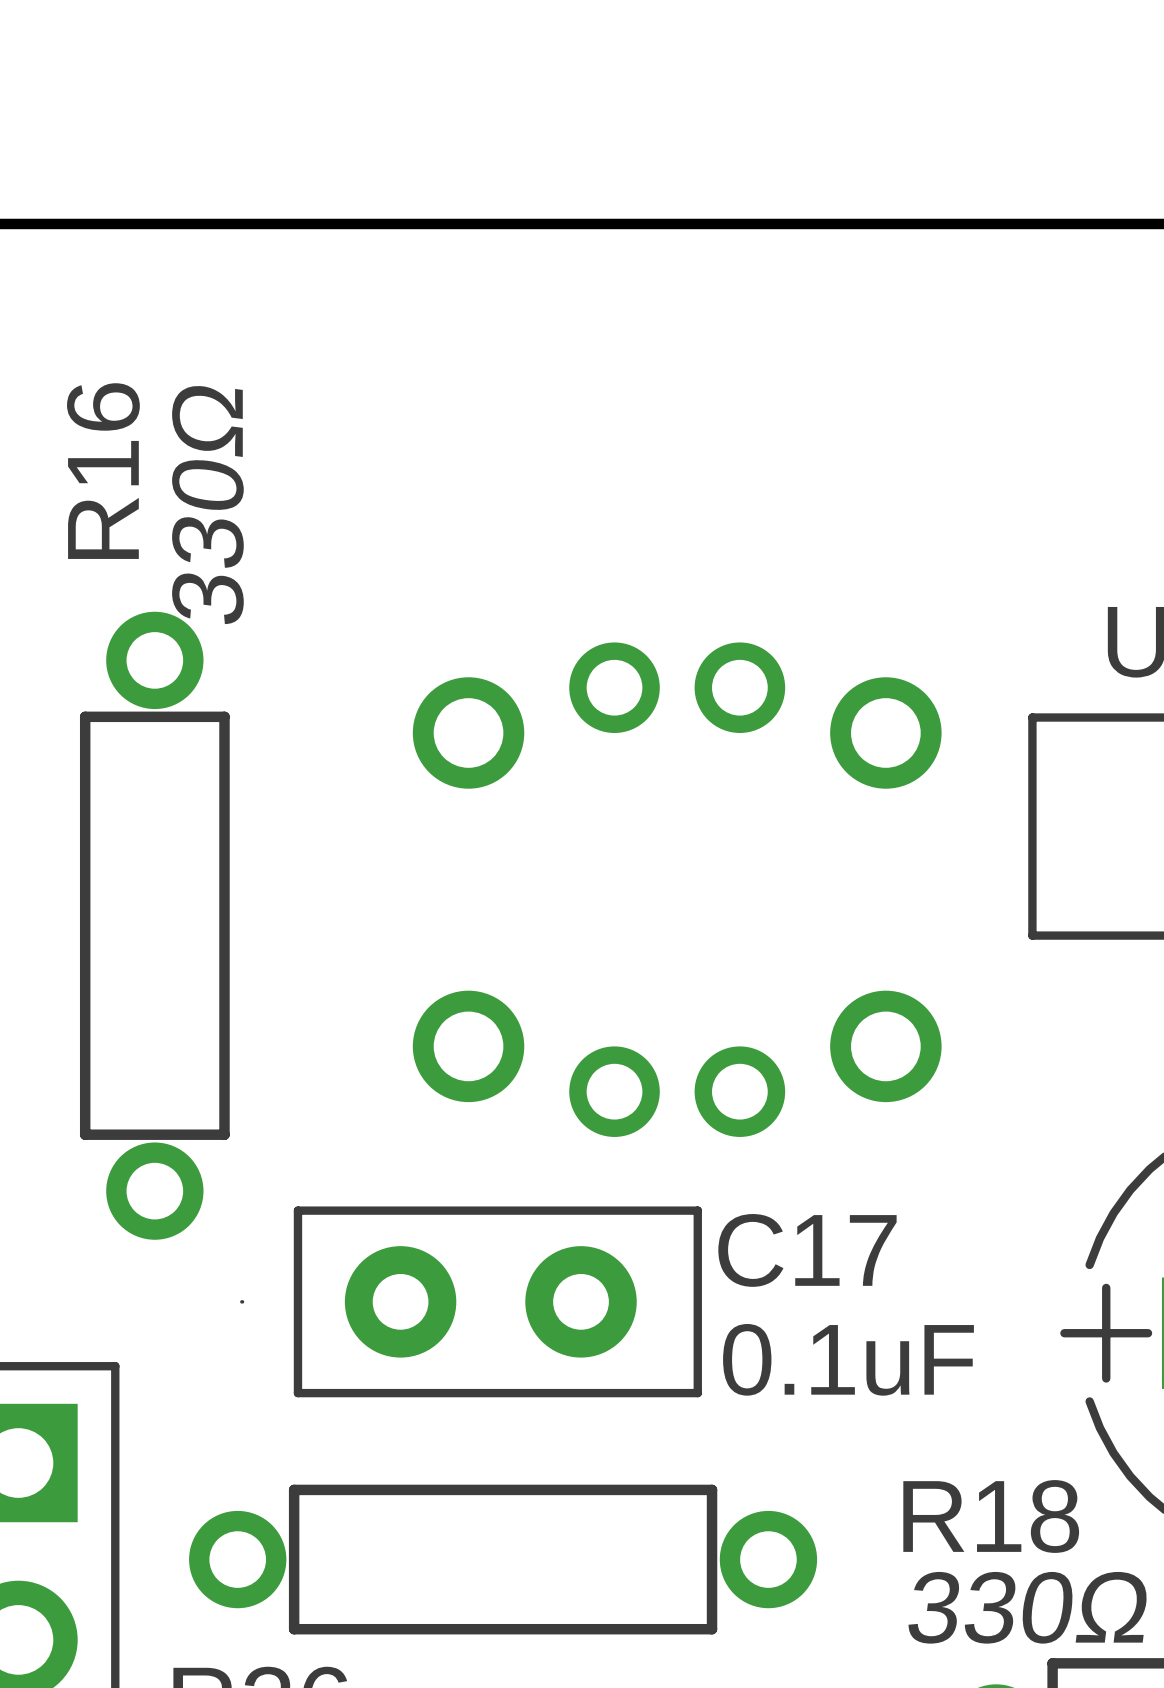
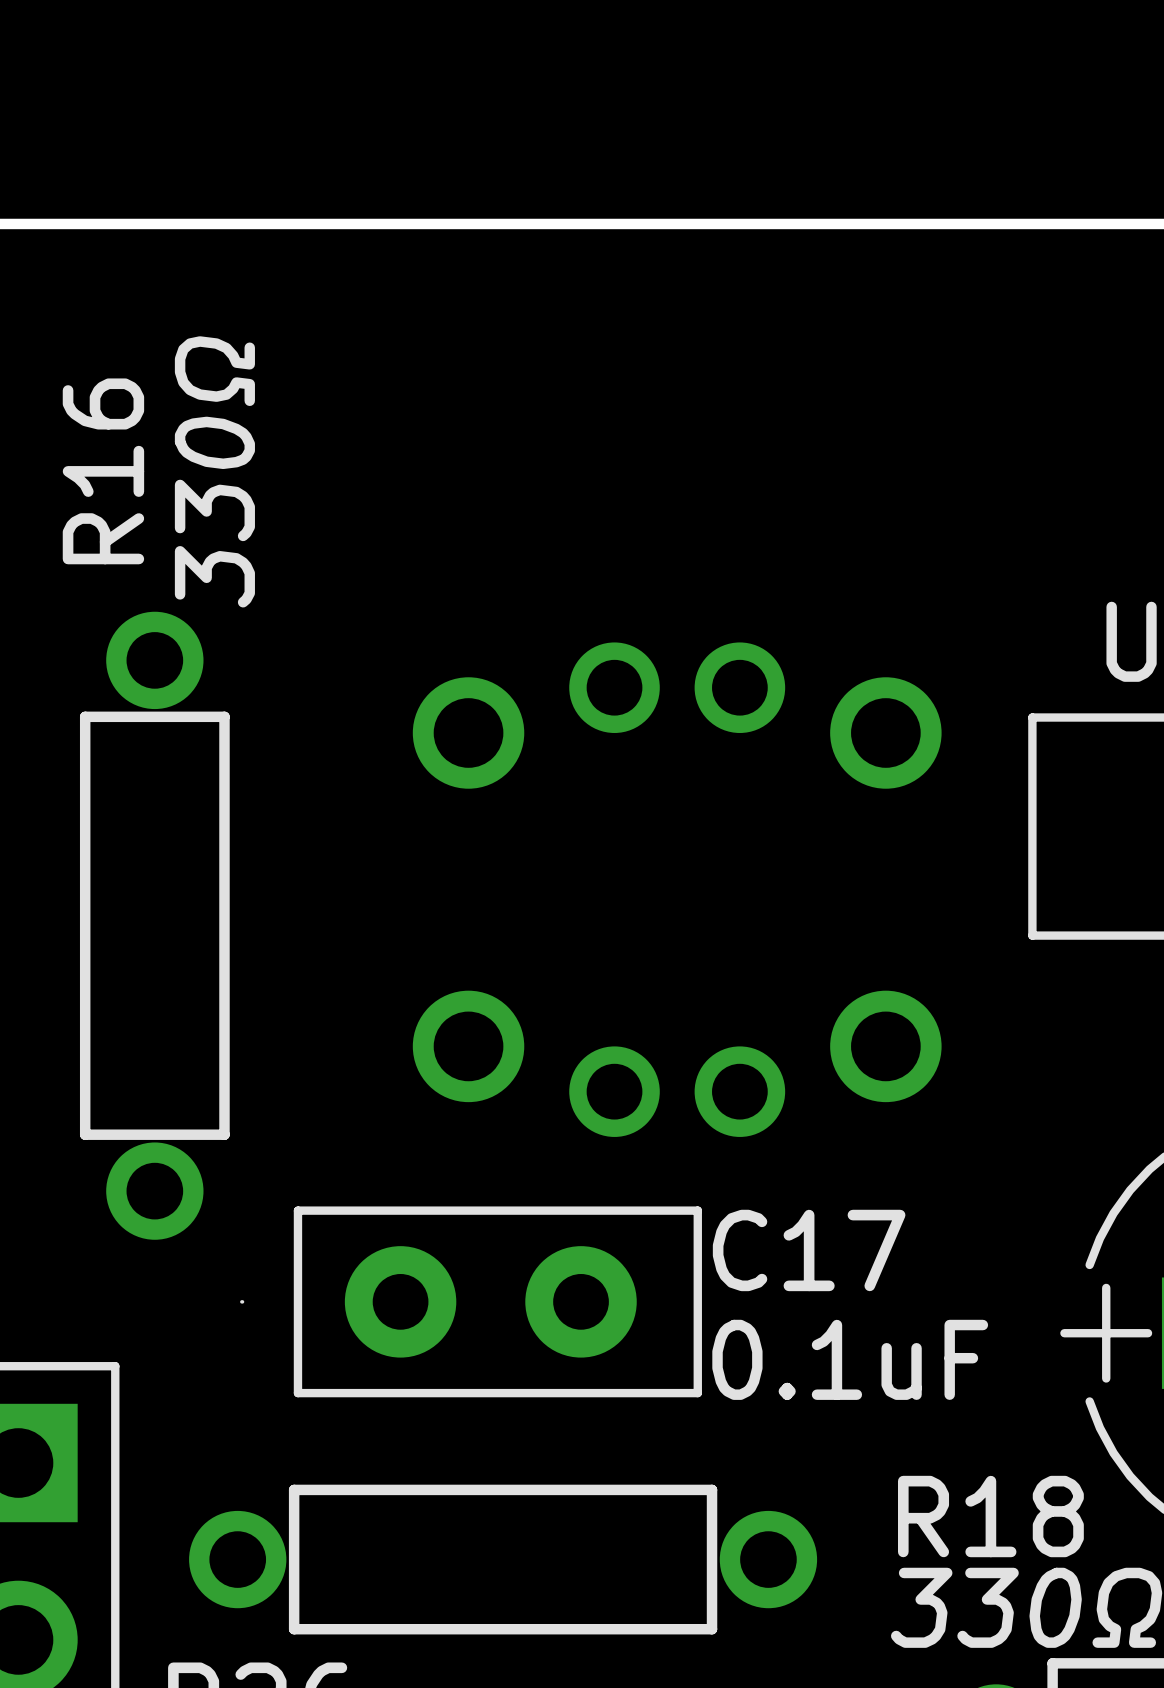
R16 text position: 330Ω (207, 504) -> 330Ω (214, 471)

